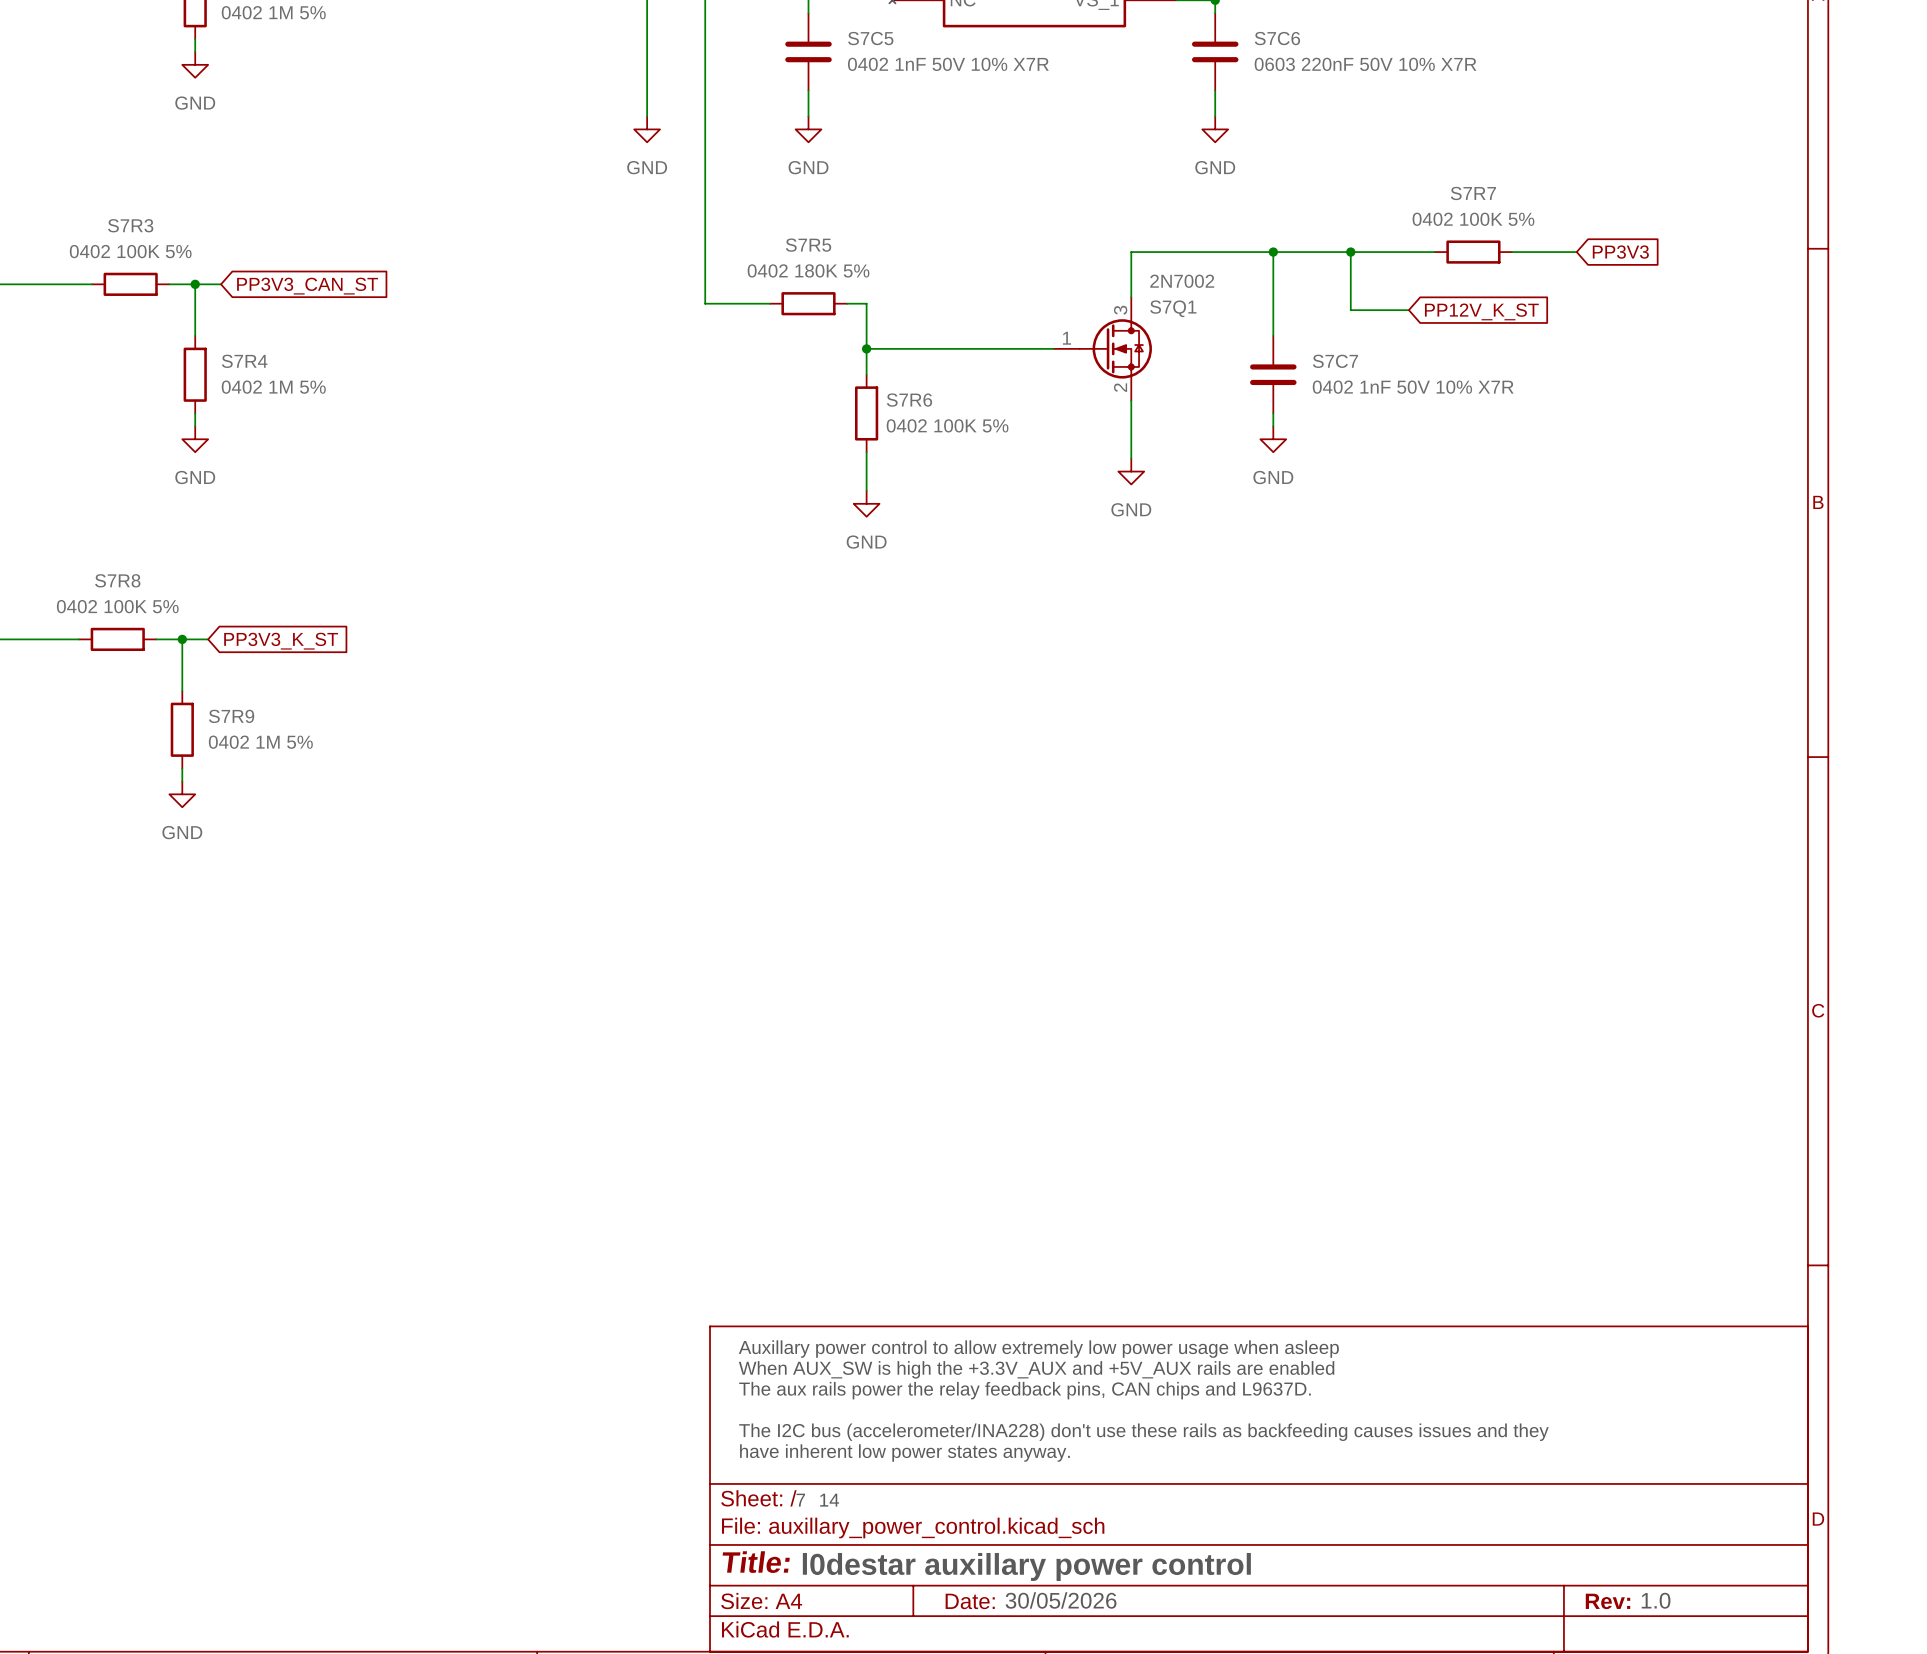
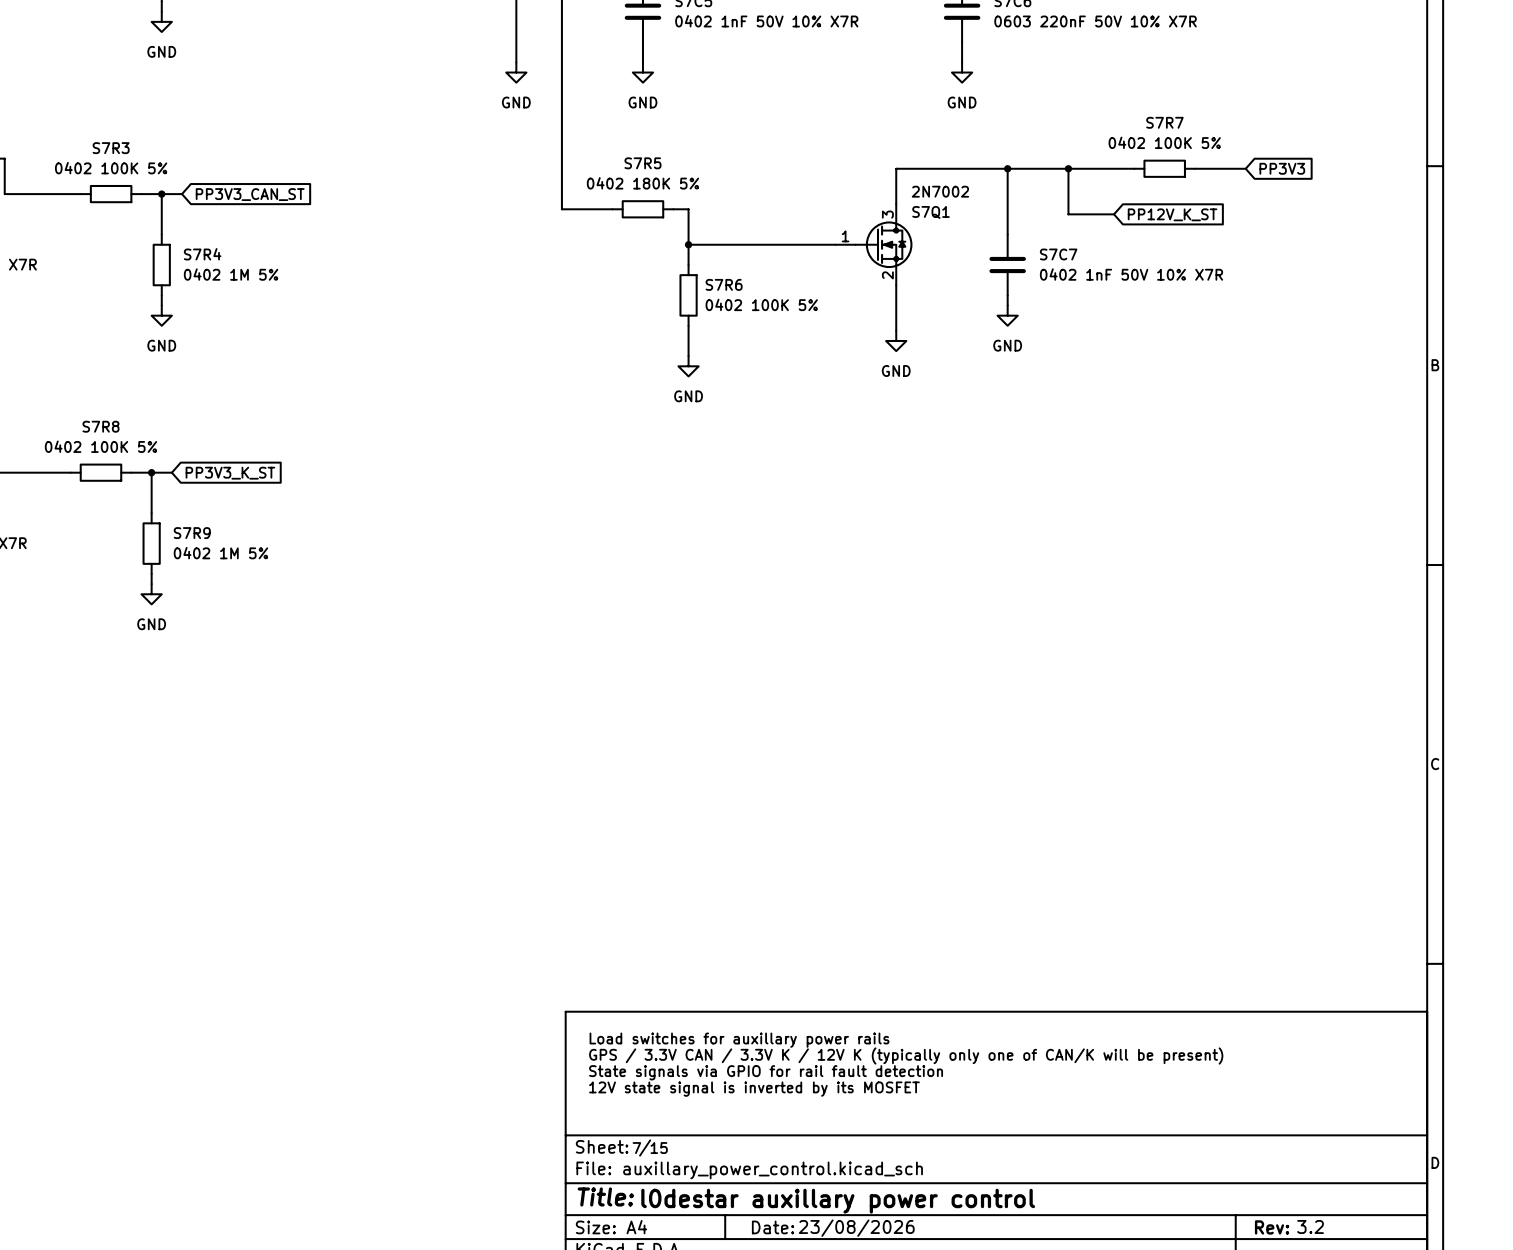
text: Auxillary power control to allow extremely low power usage when asleep (1038, 1349) -> none
text: none -> Load switches for auxillary power rails (739, 1040)
text: When AUX_SW is high the +3.3V_AUX and +5V_AUX rails are enabled (1036, 1369) -> none
text: none -> GPS / 3.3V CAN / 3.3V K / 12V K (typically only one of CAN/K will be present) (906, 1056)
text: The aux rails power the relay feedback pins, CAN chips and L9637D. (1025, 1390) -> none
text: none -> State signals via GPIO for rail fault detection (766, 1072)
text: The I2C bus (accelerometer/INA228) don't use these rails as backfeeding causes issues and they (1143, 1432) -> 12V state signal is inverted by its MOSFET (754, 1089)
text: have inherent low power states anyway. (904, 1453) -> none
text: 14 (829, 1500) -> 15 (659, 1148)
text: 30/05/2026 (1061, 1600) -> 23/08/2026 (856, 1228)
text: 1.0 (1656, 1600) -> 3.2 (1310, 1226)

